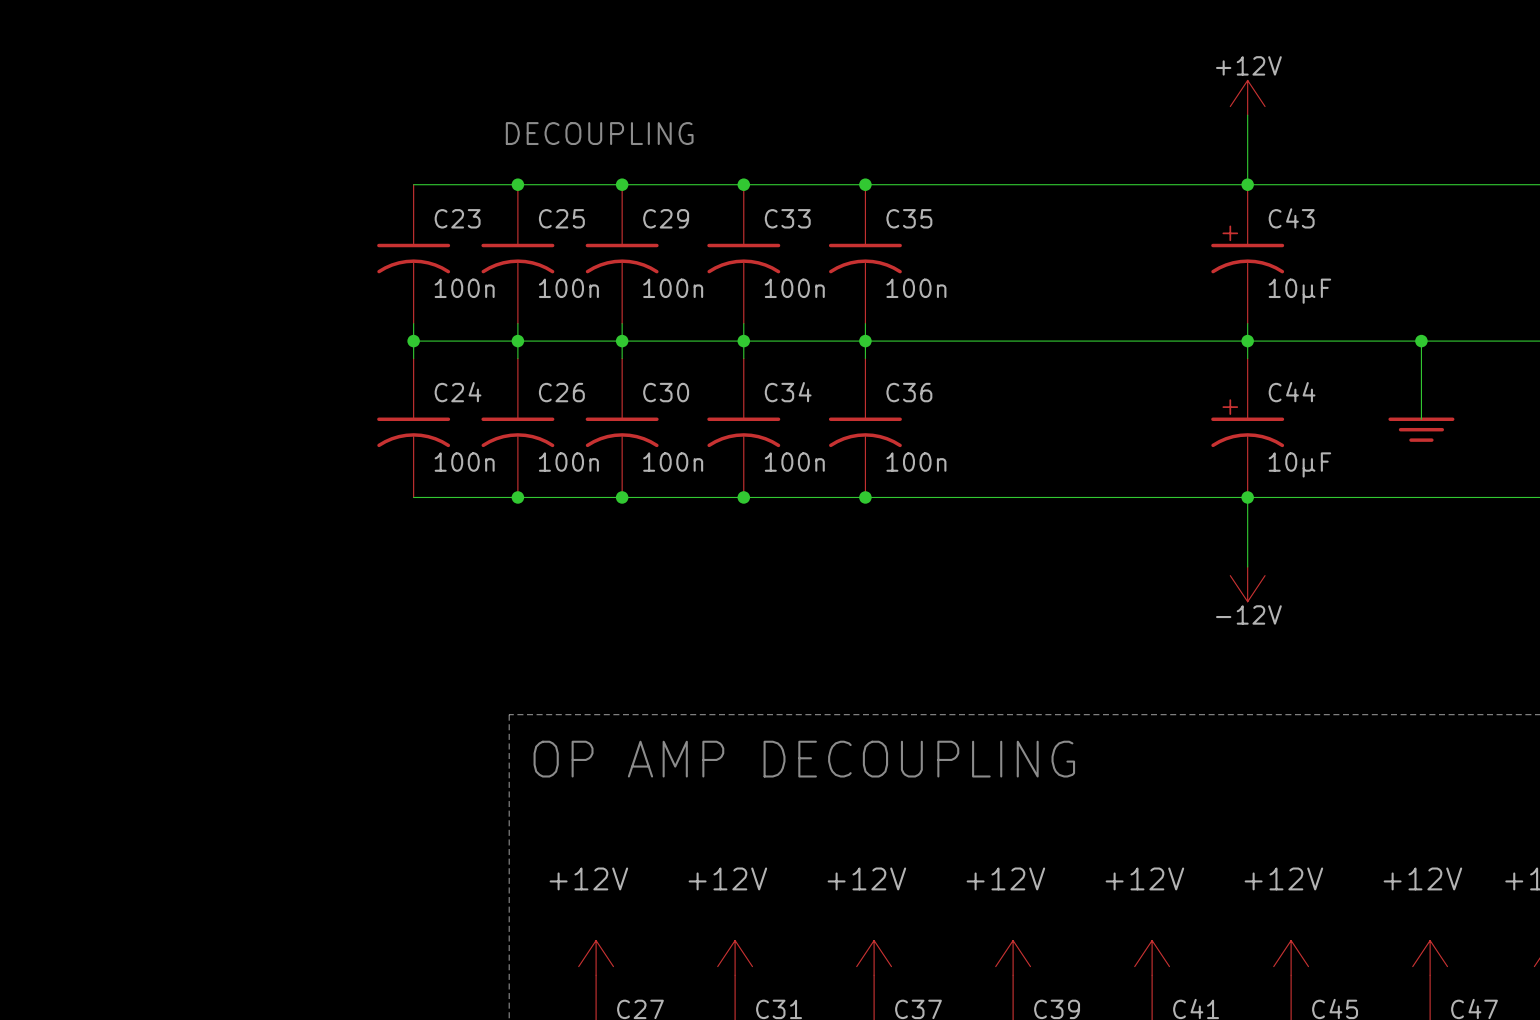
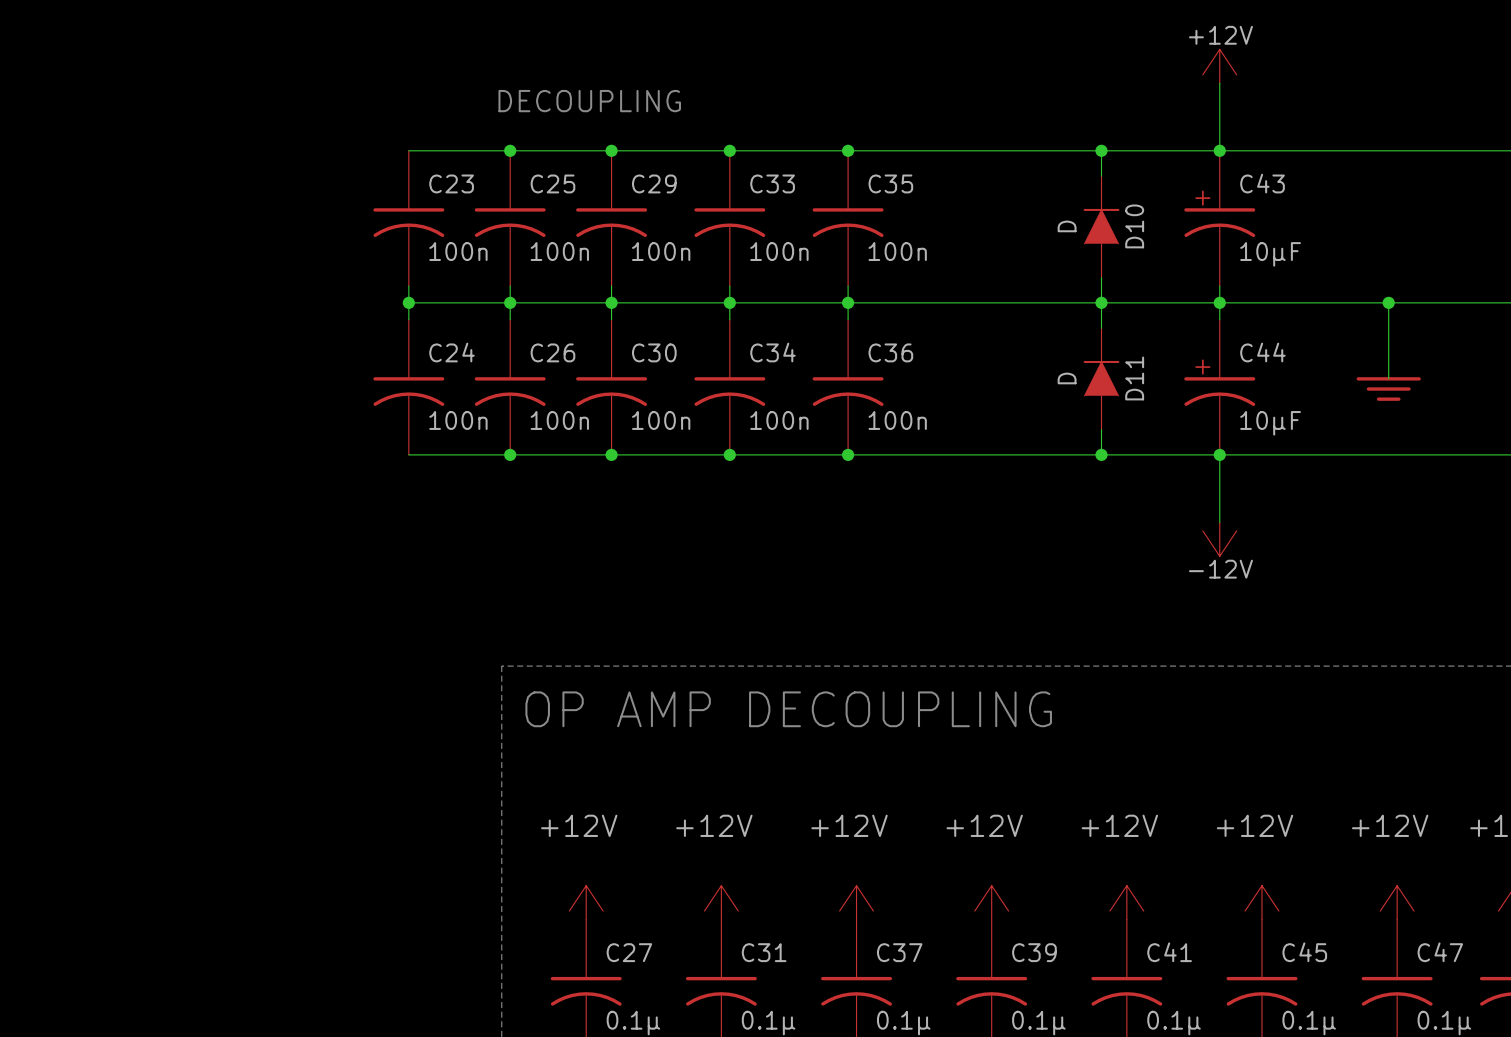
wire: none -> (1101, 150) (1101, 176)
junction: none -> (1101, 150)
D10: none -> D (1101, 226)
wire: none -> (1101, 277) (1101, 328)
junction: none -> (1101, 302)
D11: none -> D (1101, 378)
wire: none -> (1101, 429) (1101, 454)
junction: none -> (1101, 454)

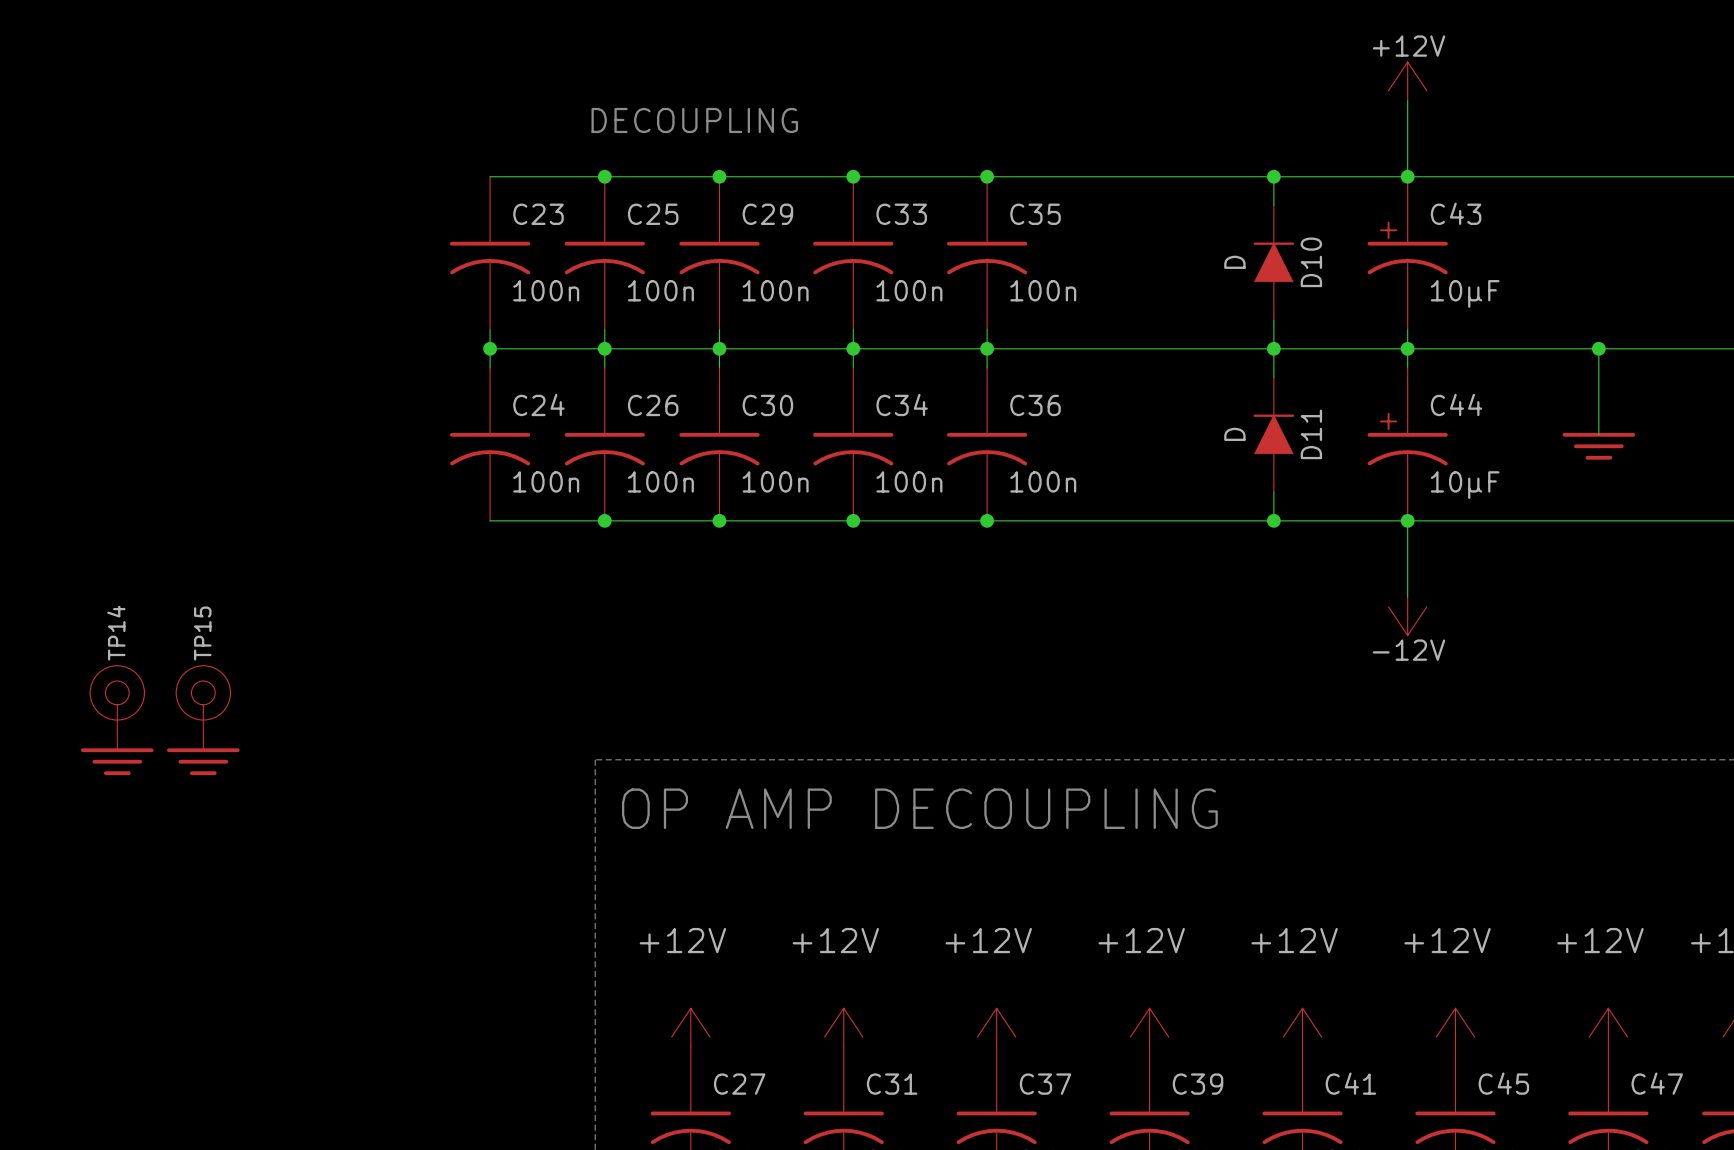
TP14: none -> (117, 708)
TP15: none -> (203, 708)
power symbol: none -> (117, 761)
power symbol: none -> (203, 761)

